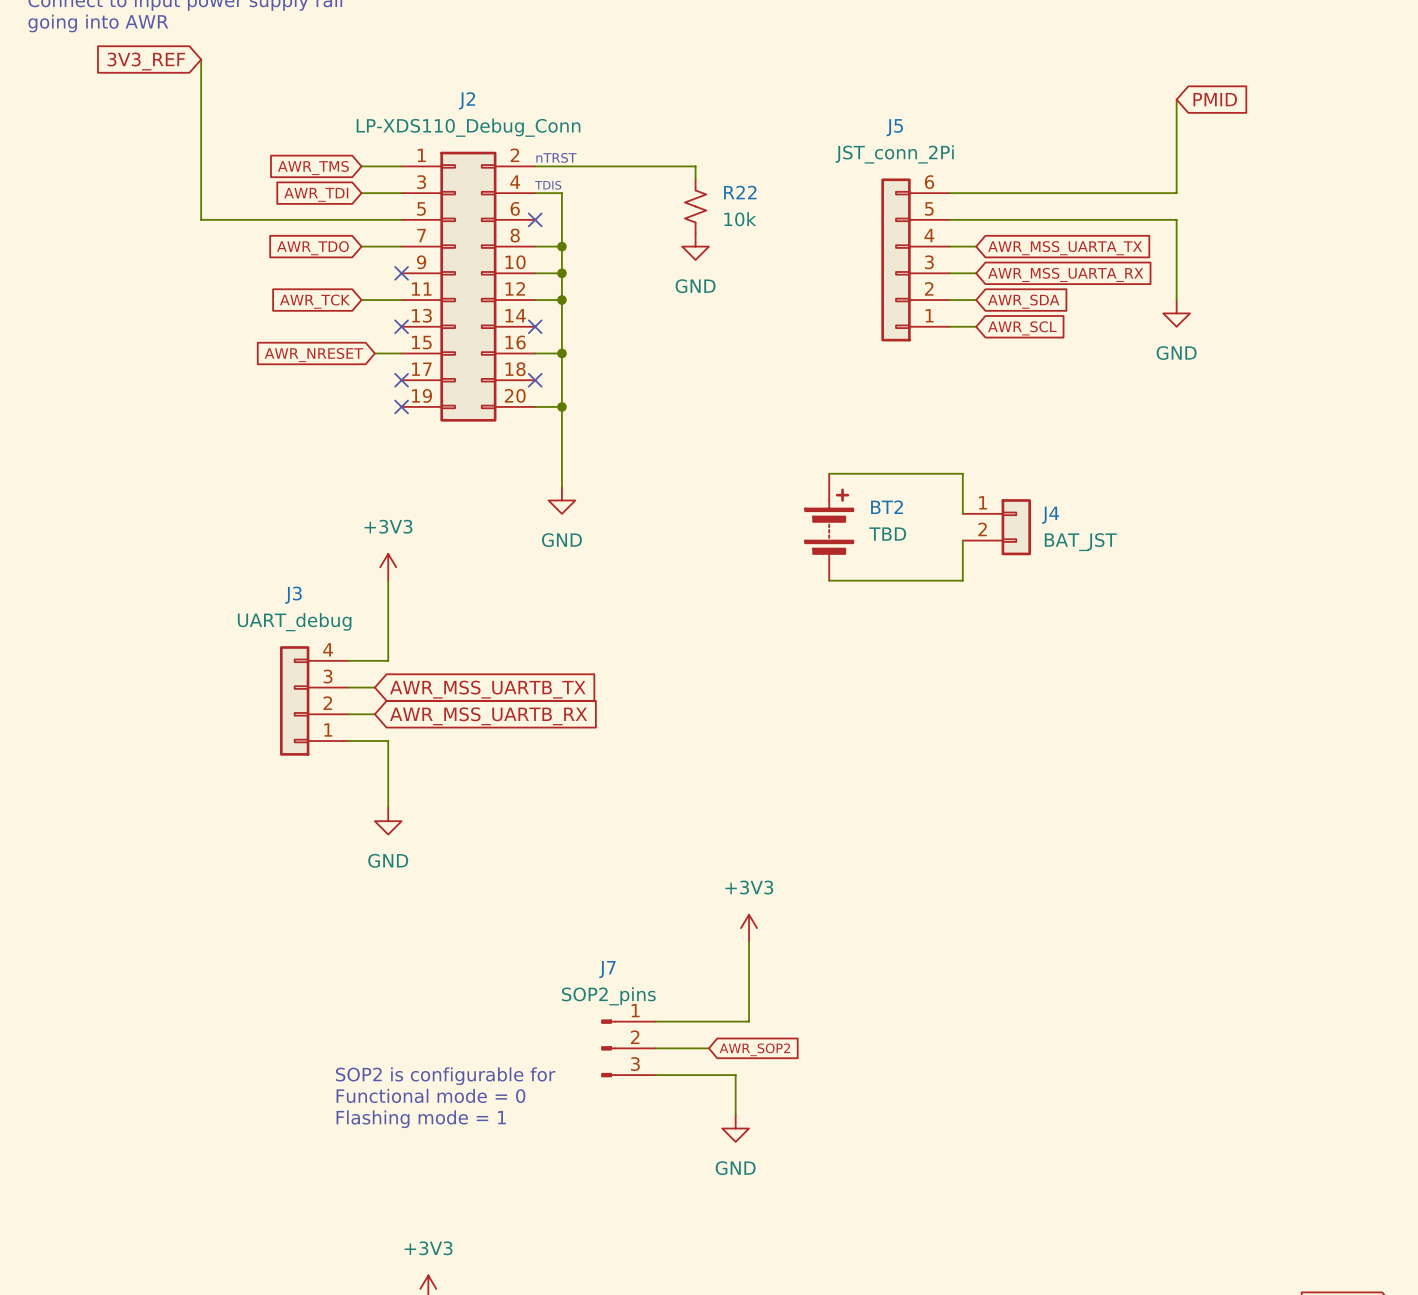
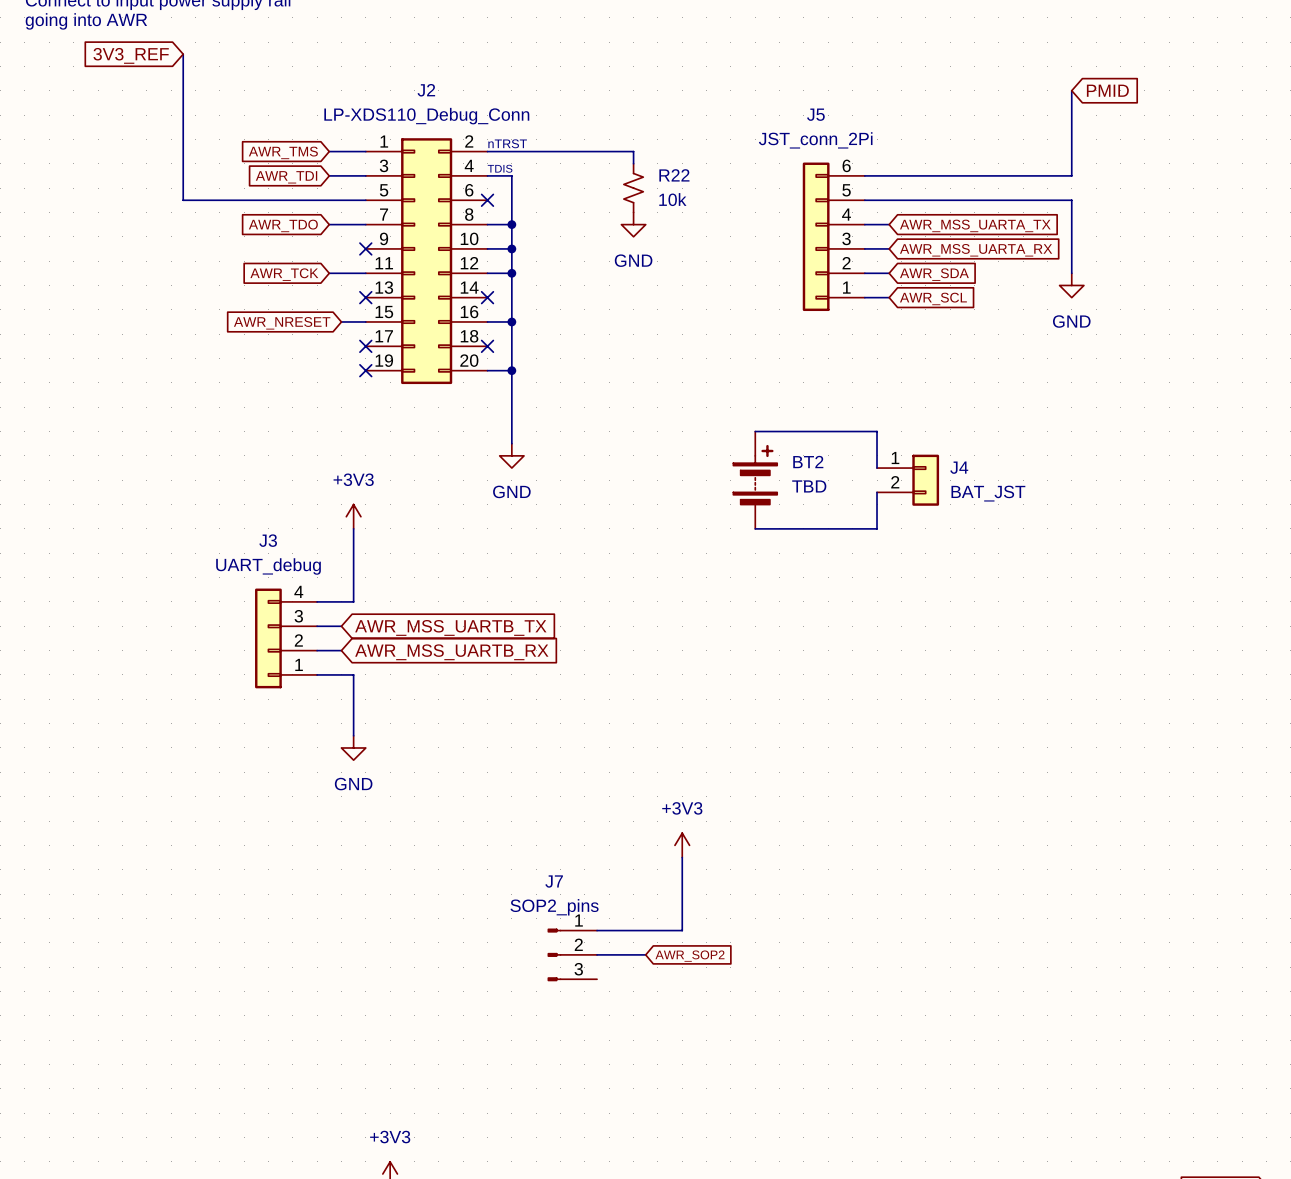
wire: (655, 1075) (735, 1075) (735, 1115) -> none
text: SOP2 is configurable for (445, 1076) -> none
text: Functional mode = 0 (430, 1095) -> none
text: Flashing mode = 1 (421, 1119) -> none
power symbol: GND (735, 1128) -> none

